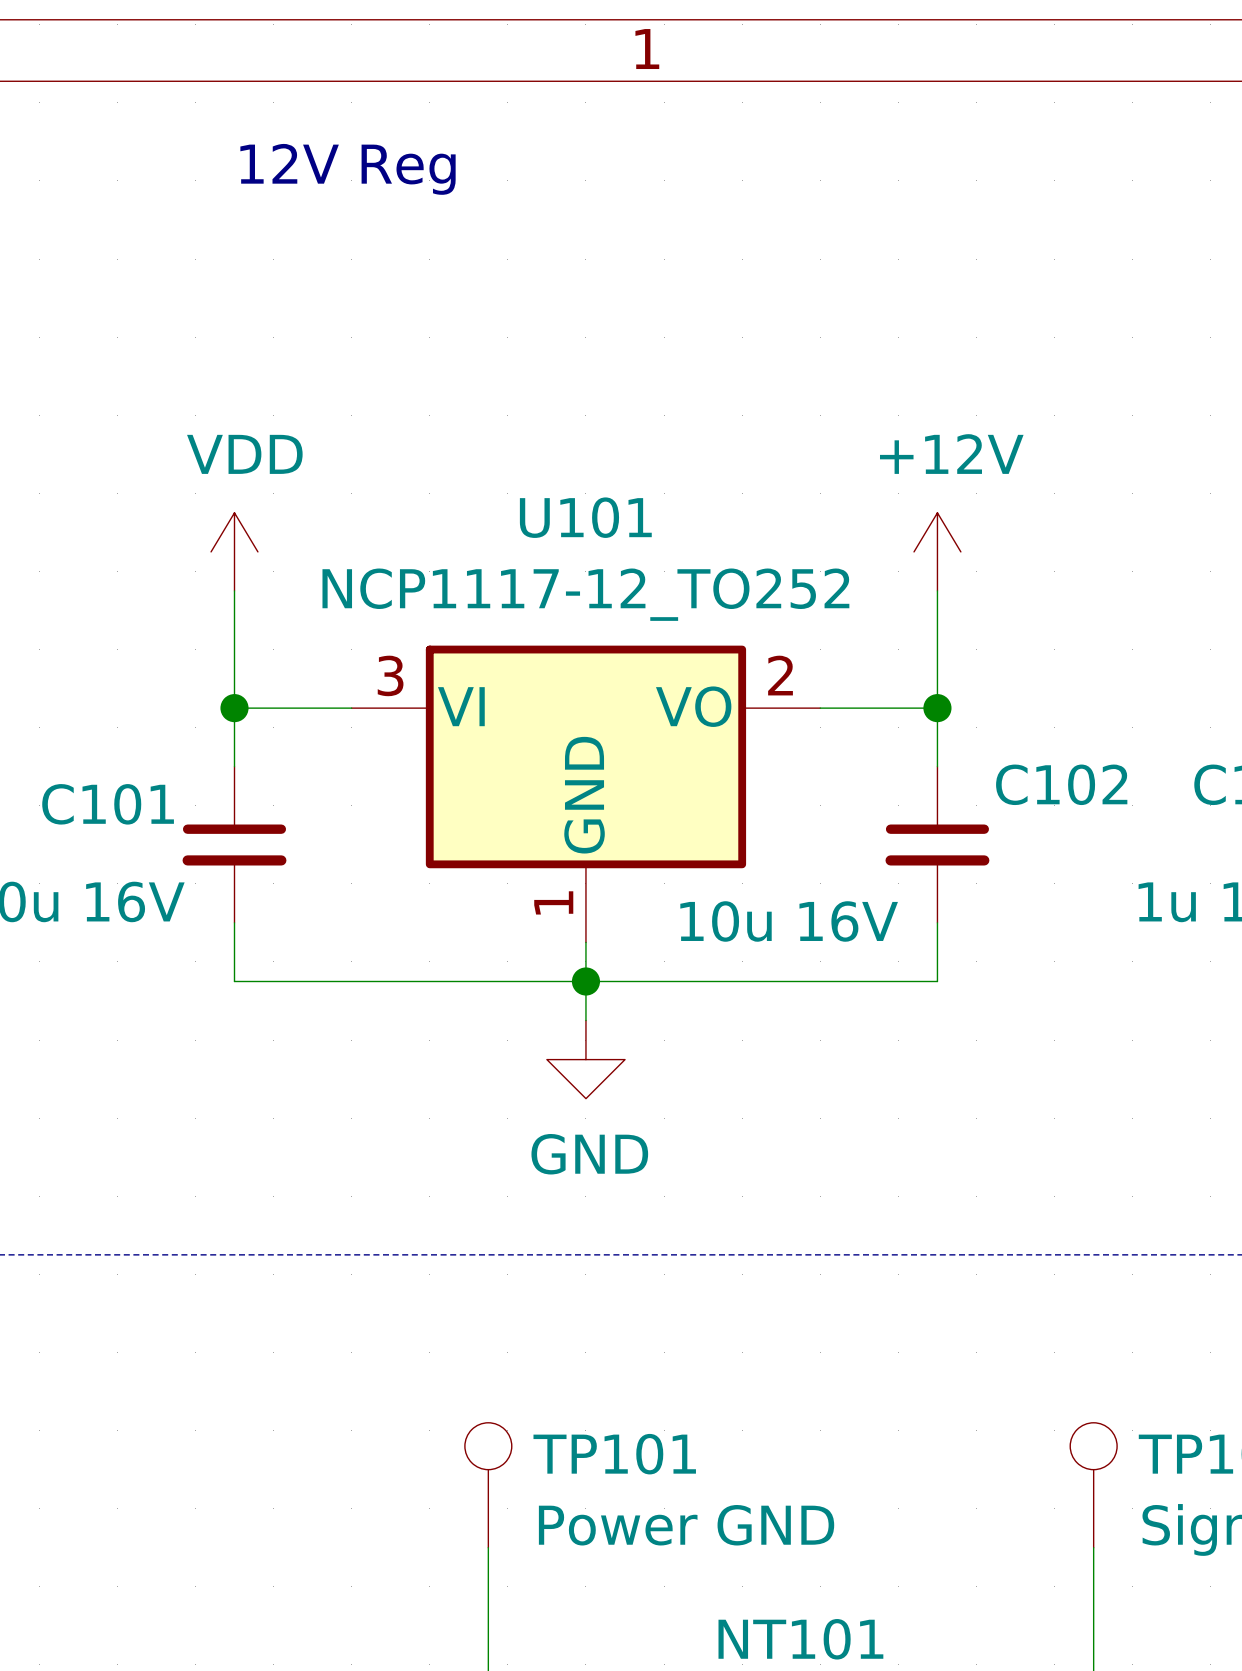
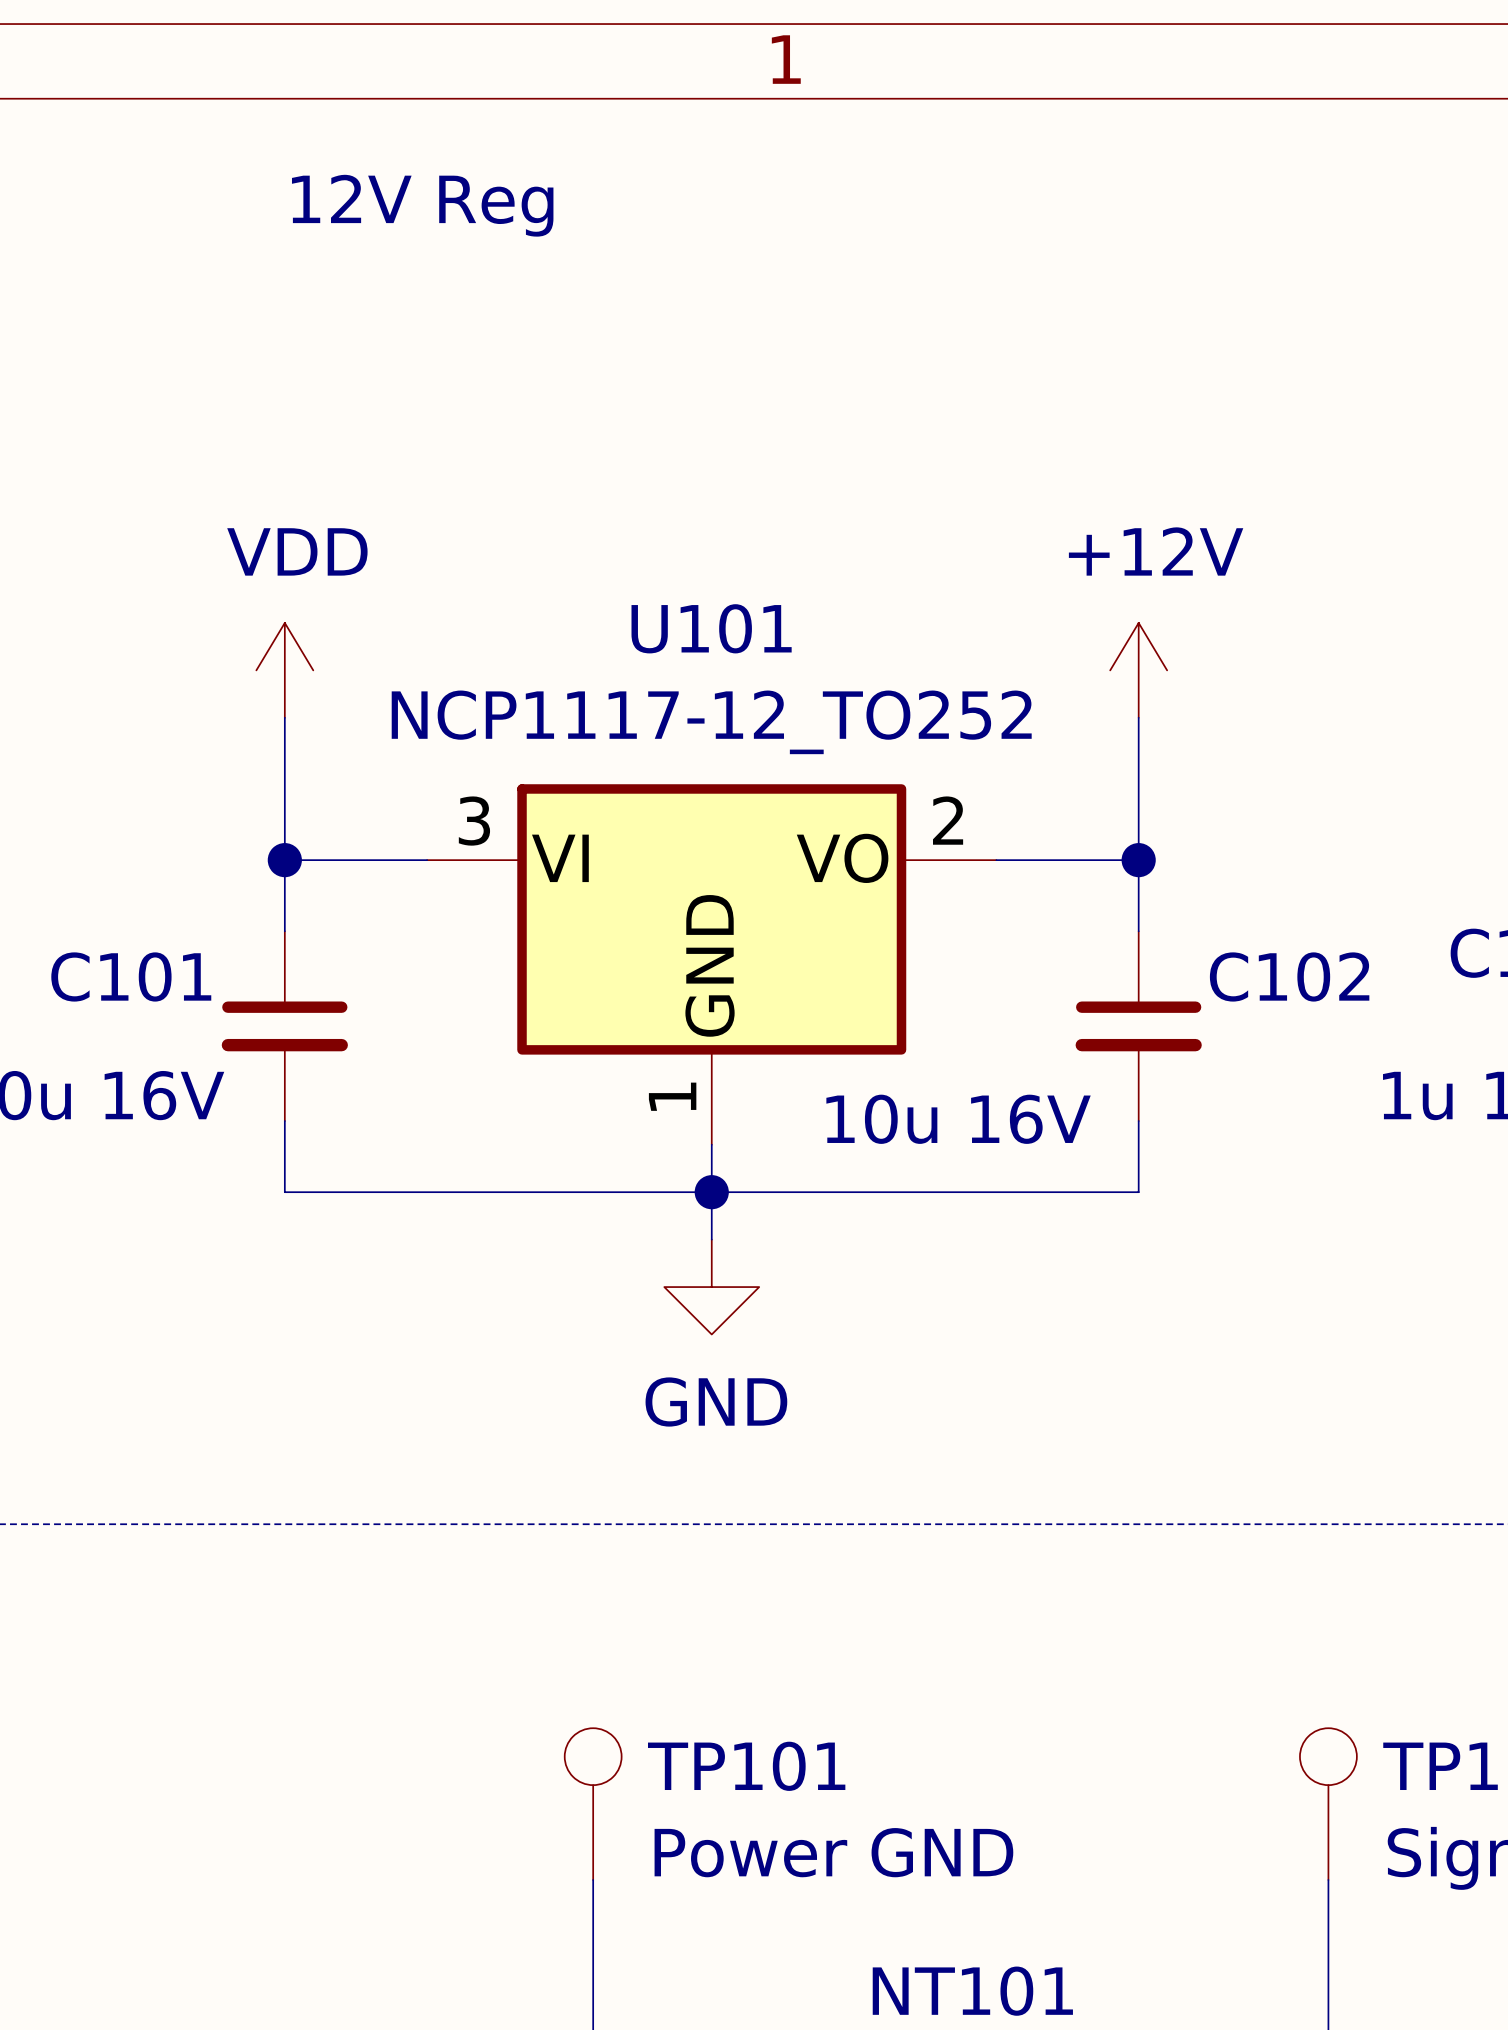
C102 name position: C102 (1061, 784) -> C102 (1289, 976)

